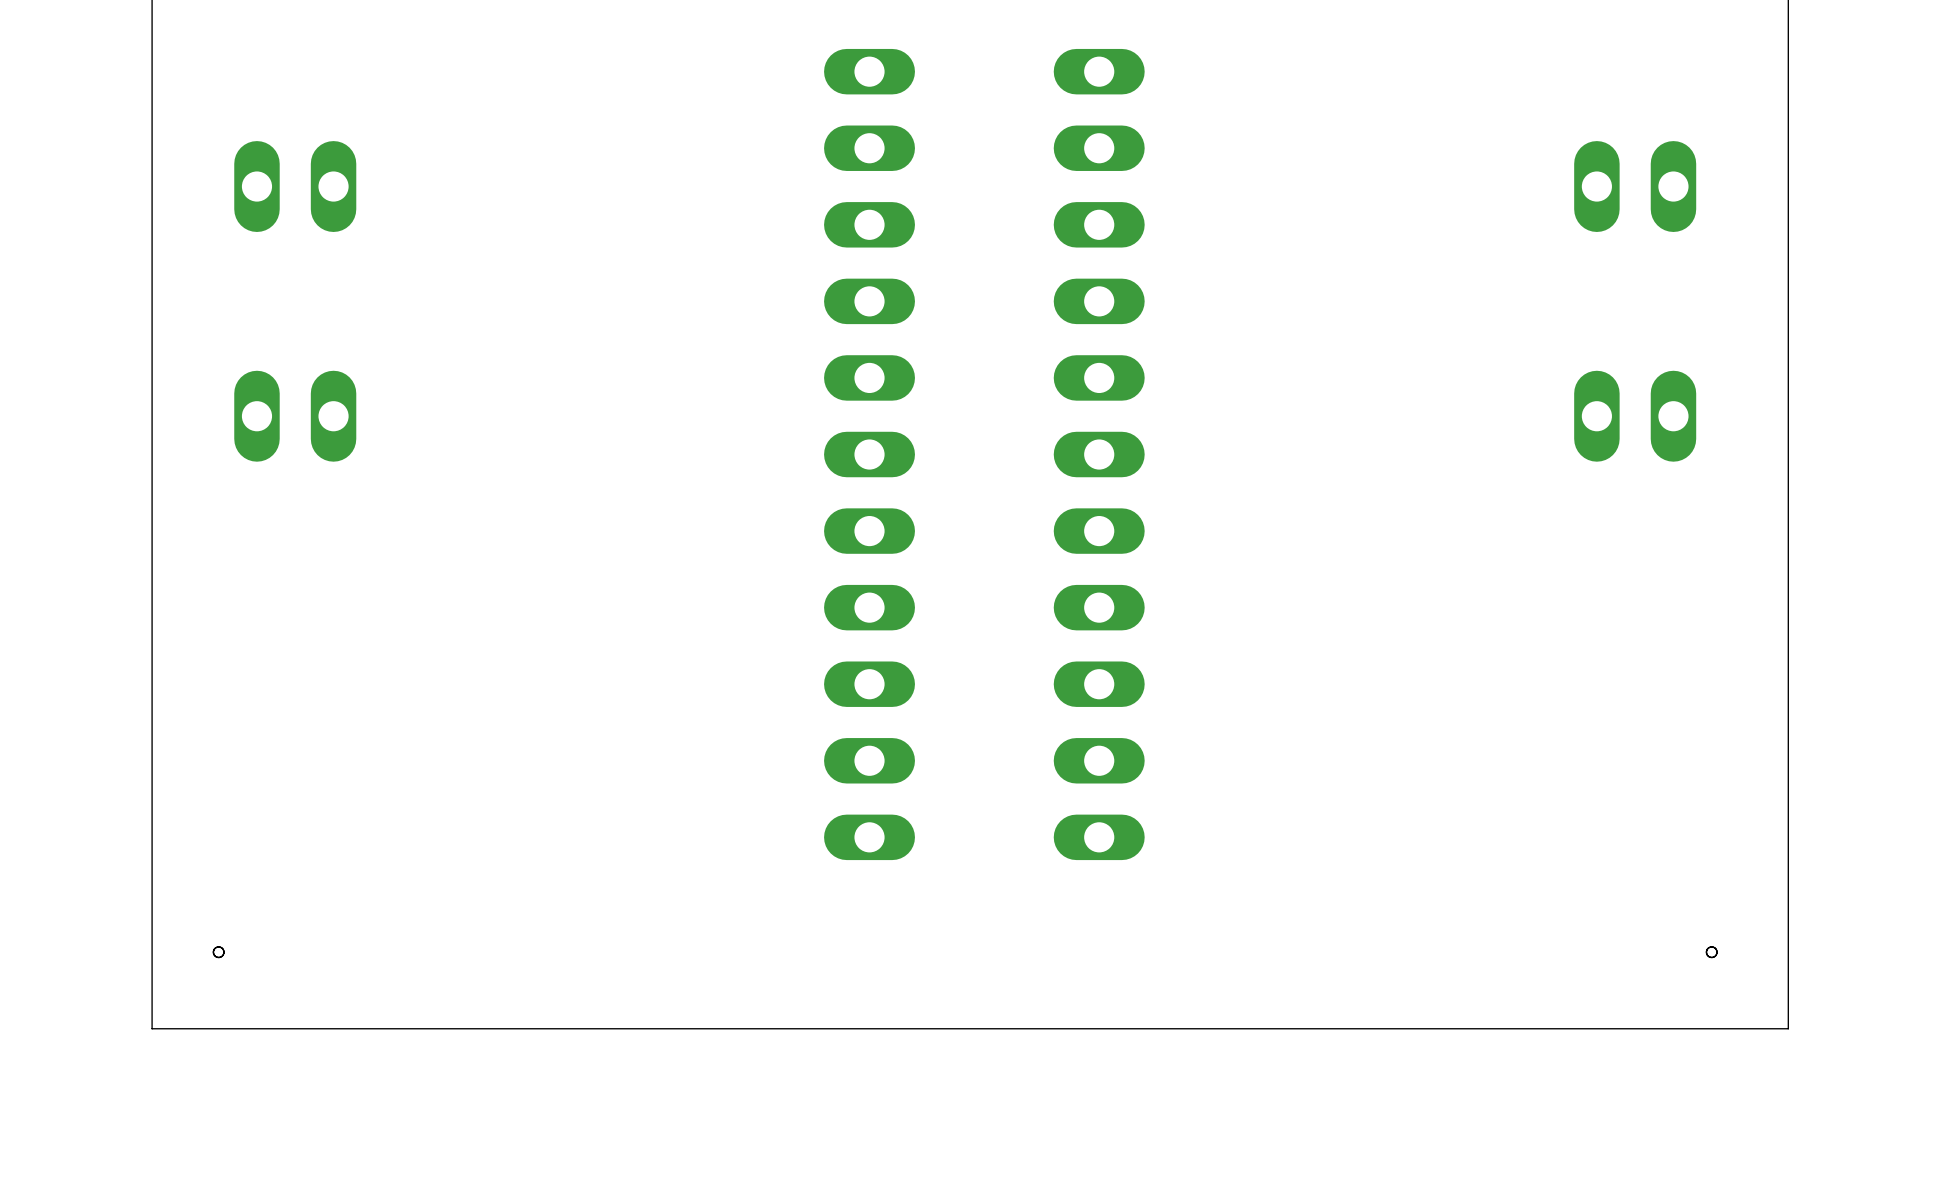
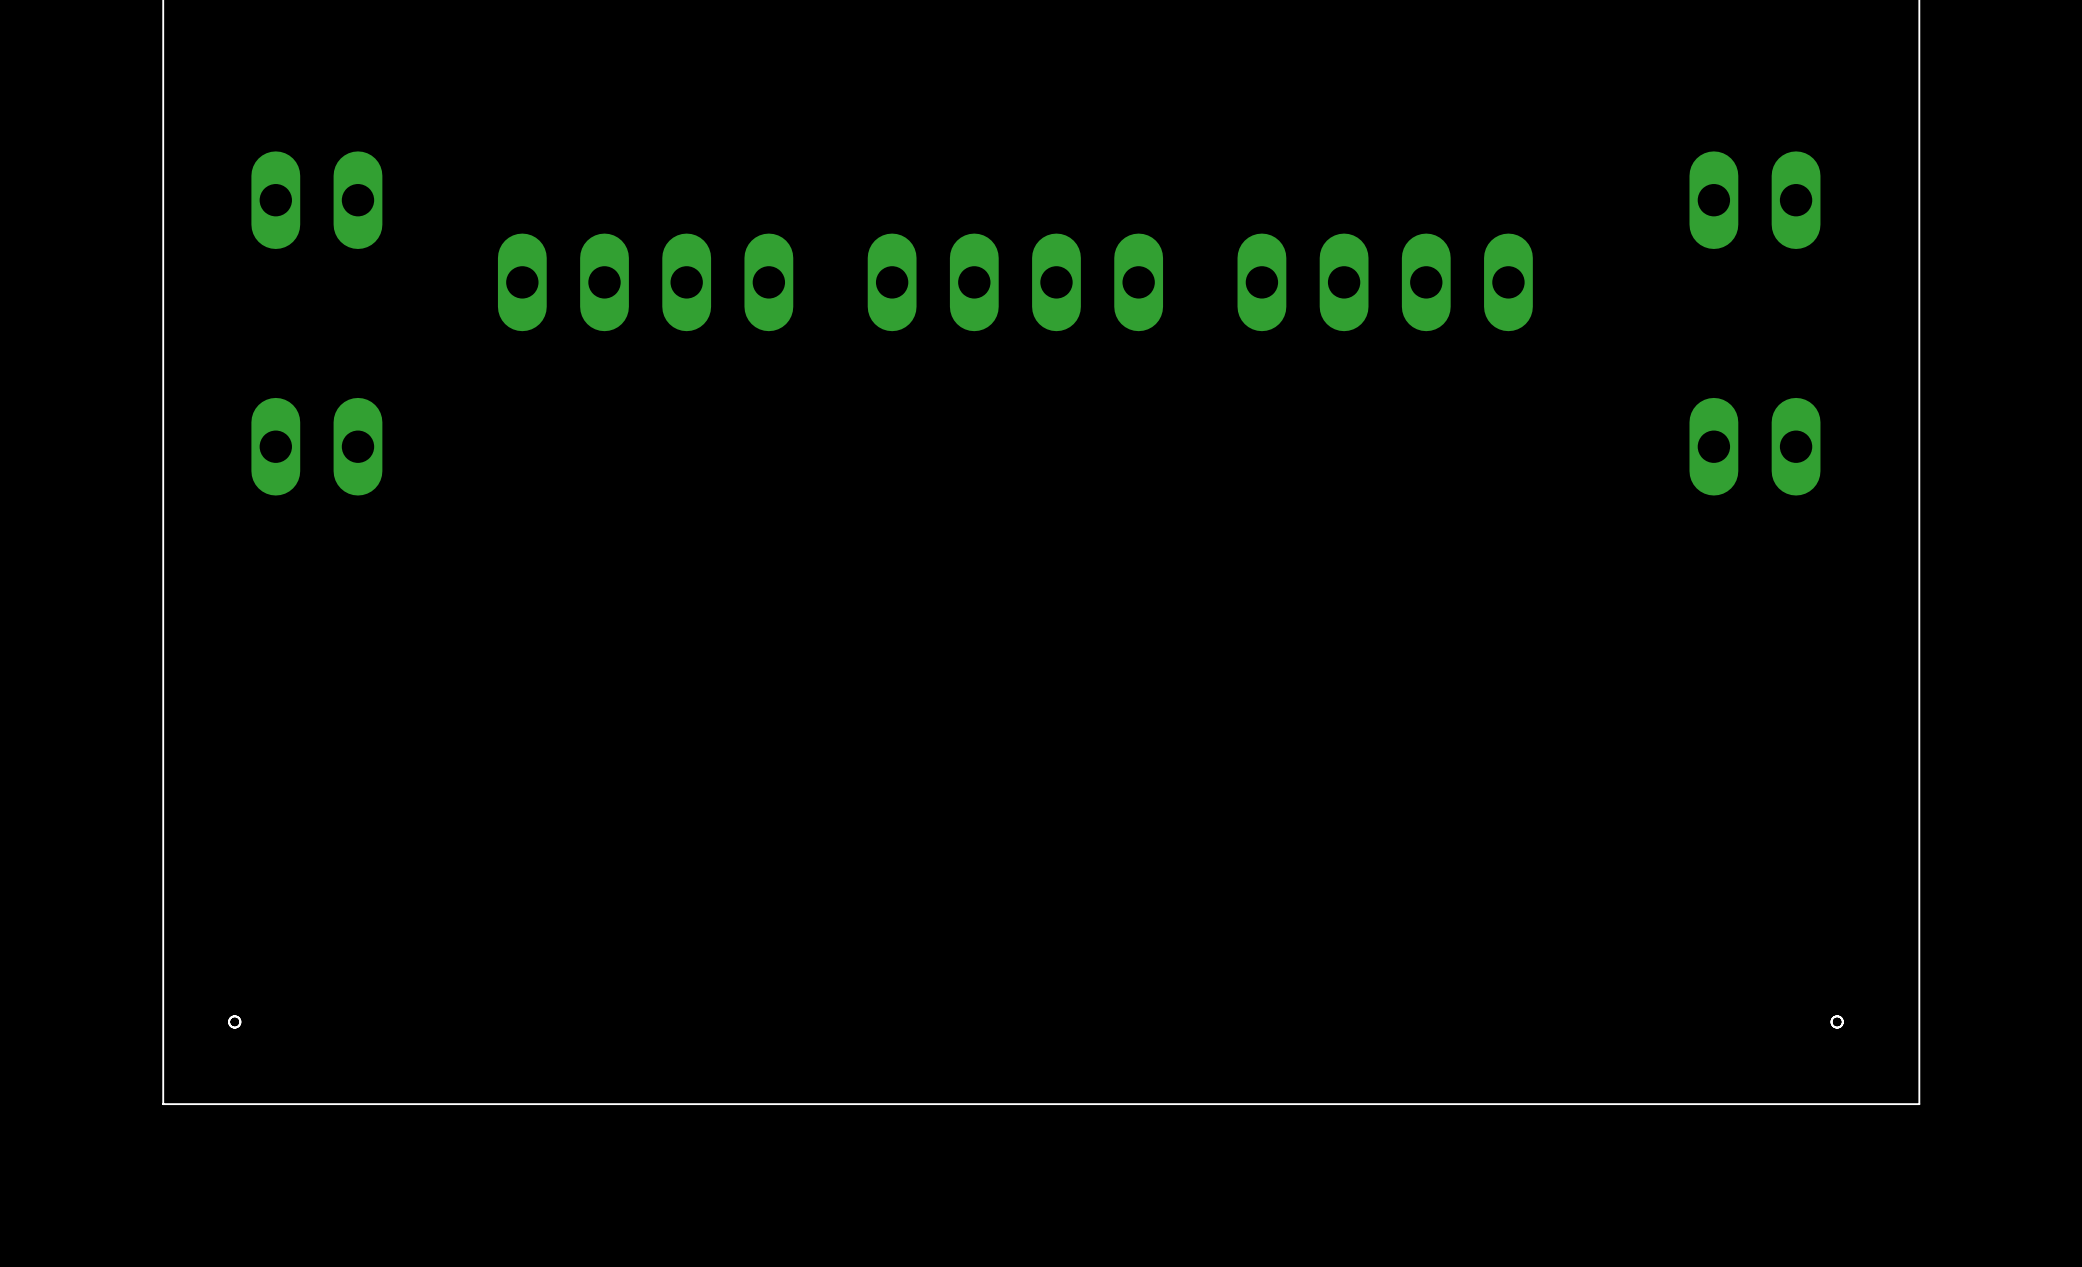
part: none -> (645, 282)
part: none -> (1015, 282)
part: none -> (1385, 282)
part: (869, 454) -> none
part: (1099, 454) -> none

